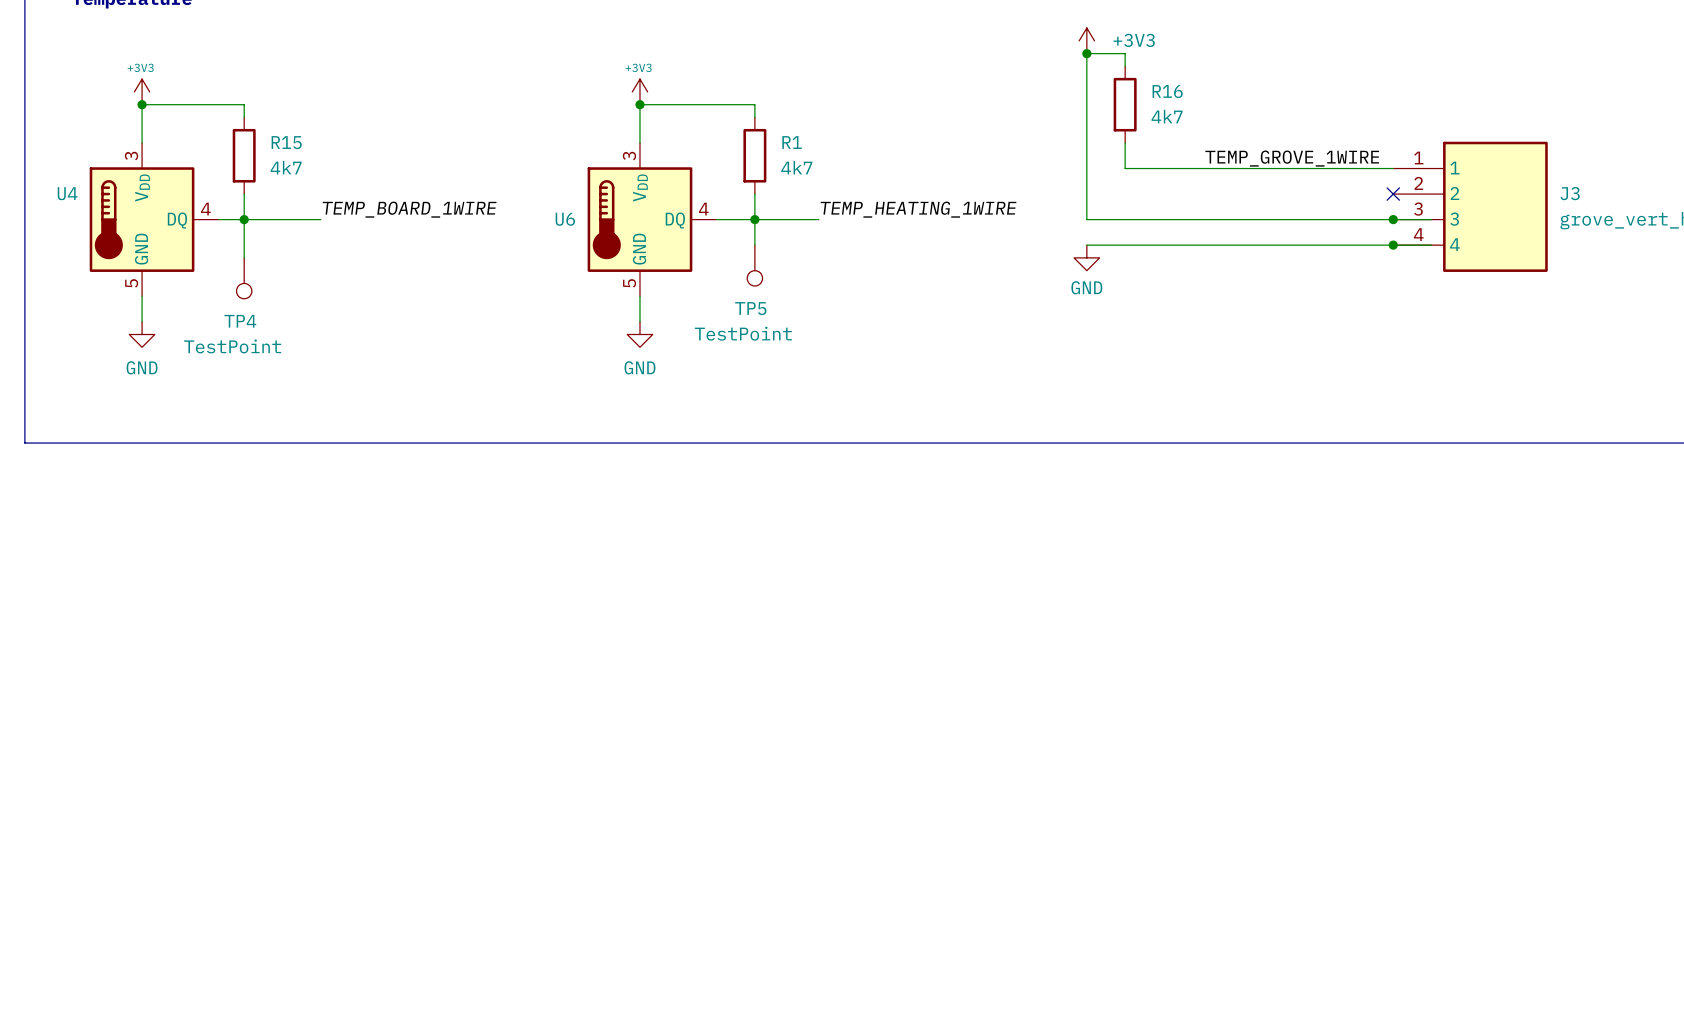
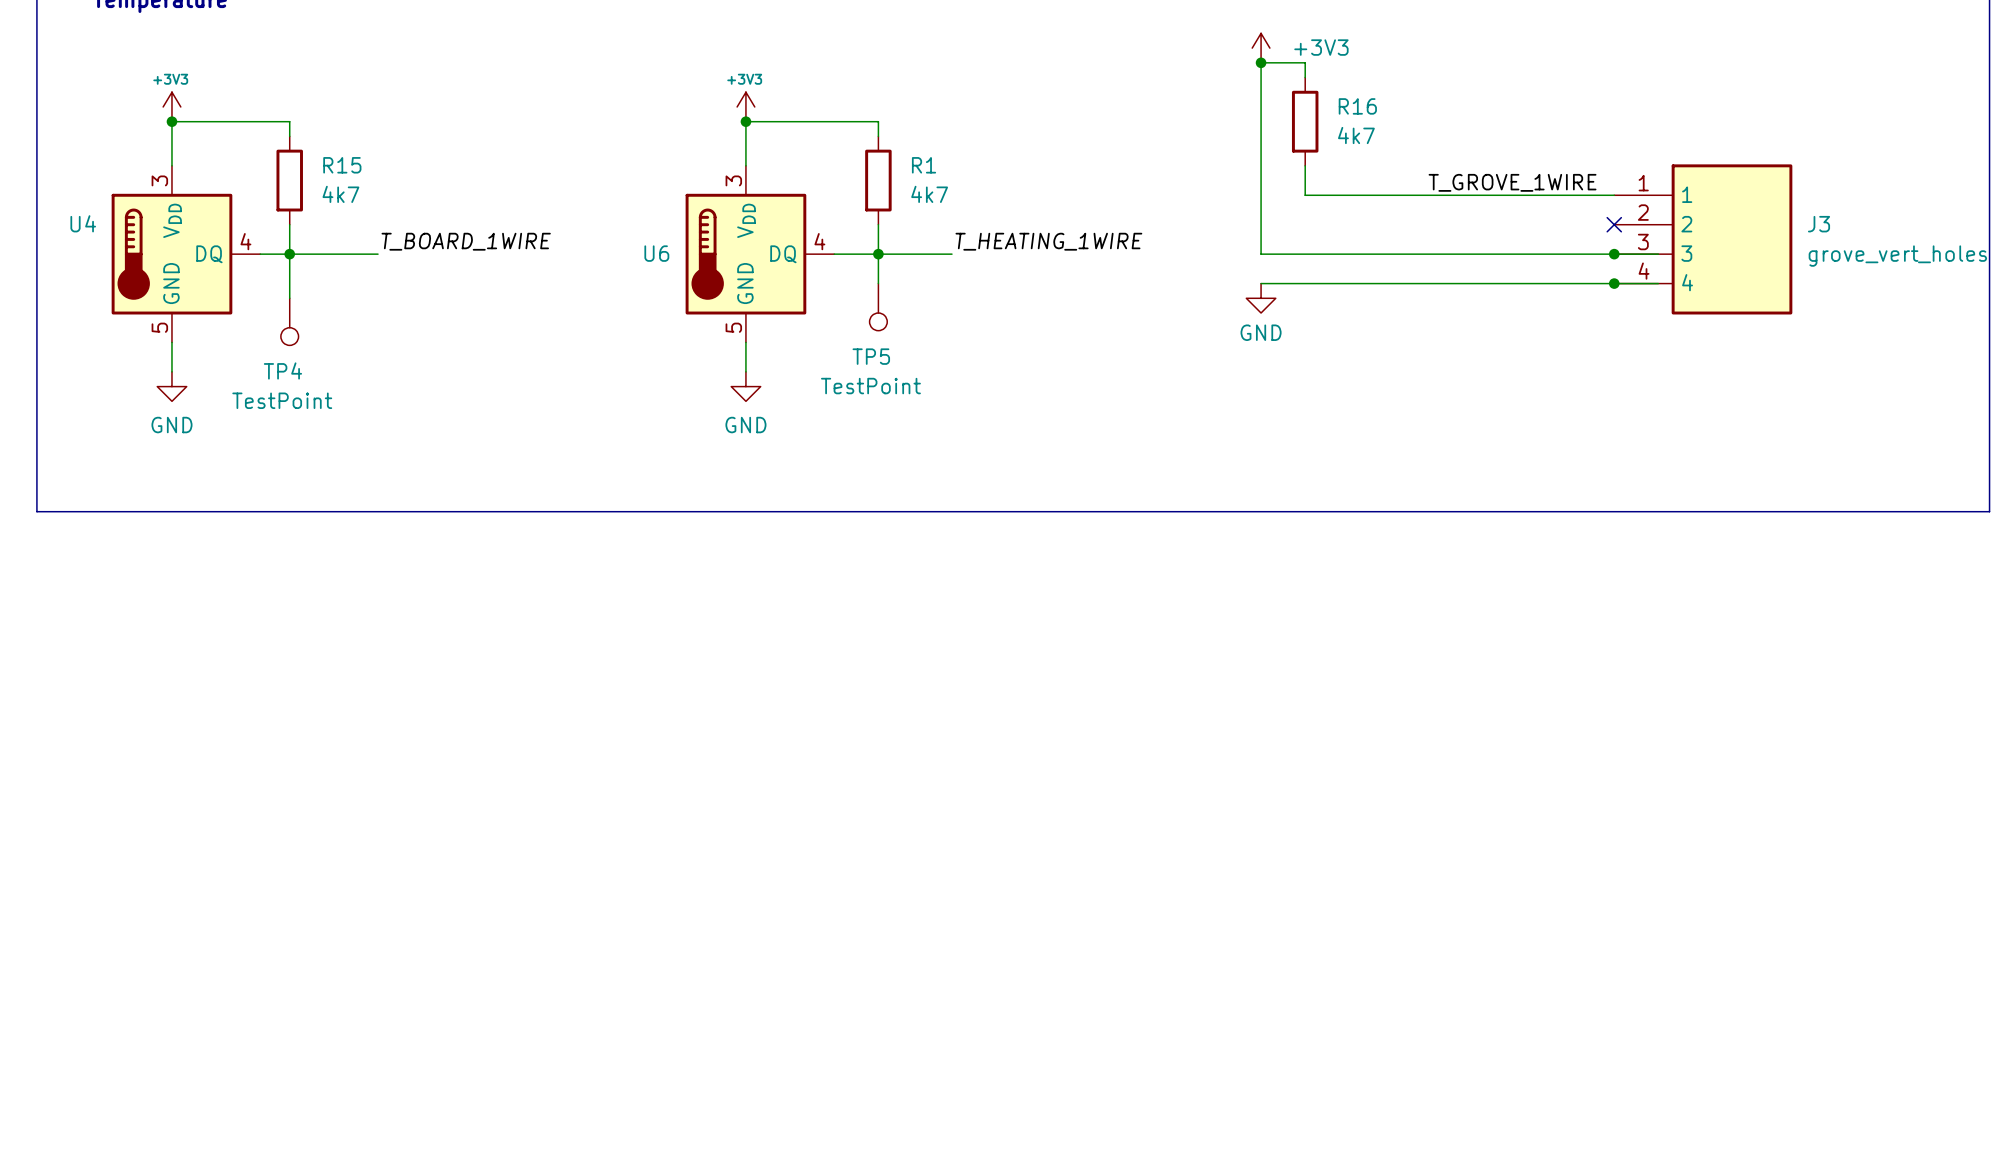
label: TEMP_GROVE_1WIRE (1292, 158) -> T_GROVE_1WIRE (1512, 182)
label: TEMP_BOARD_1WIRE (409, 209) -> T_BOARD_1WIRE (466, 241)
label: TEMP_HEATING_1WIRE (918, 209) -> T_HEATING_1WIRE (1048, 241)

